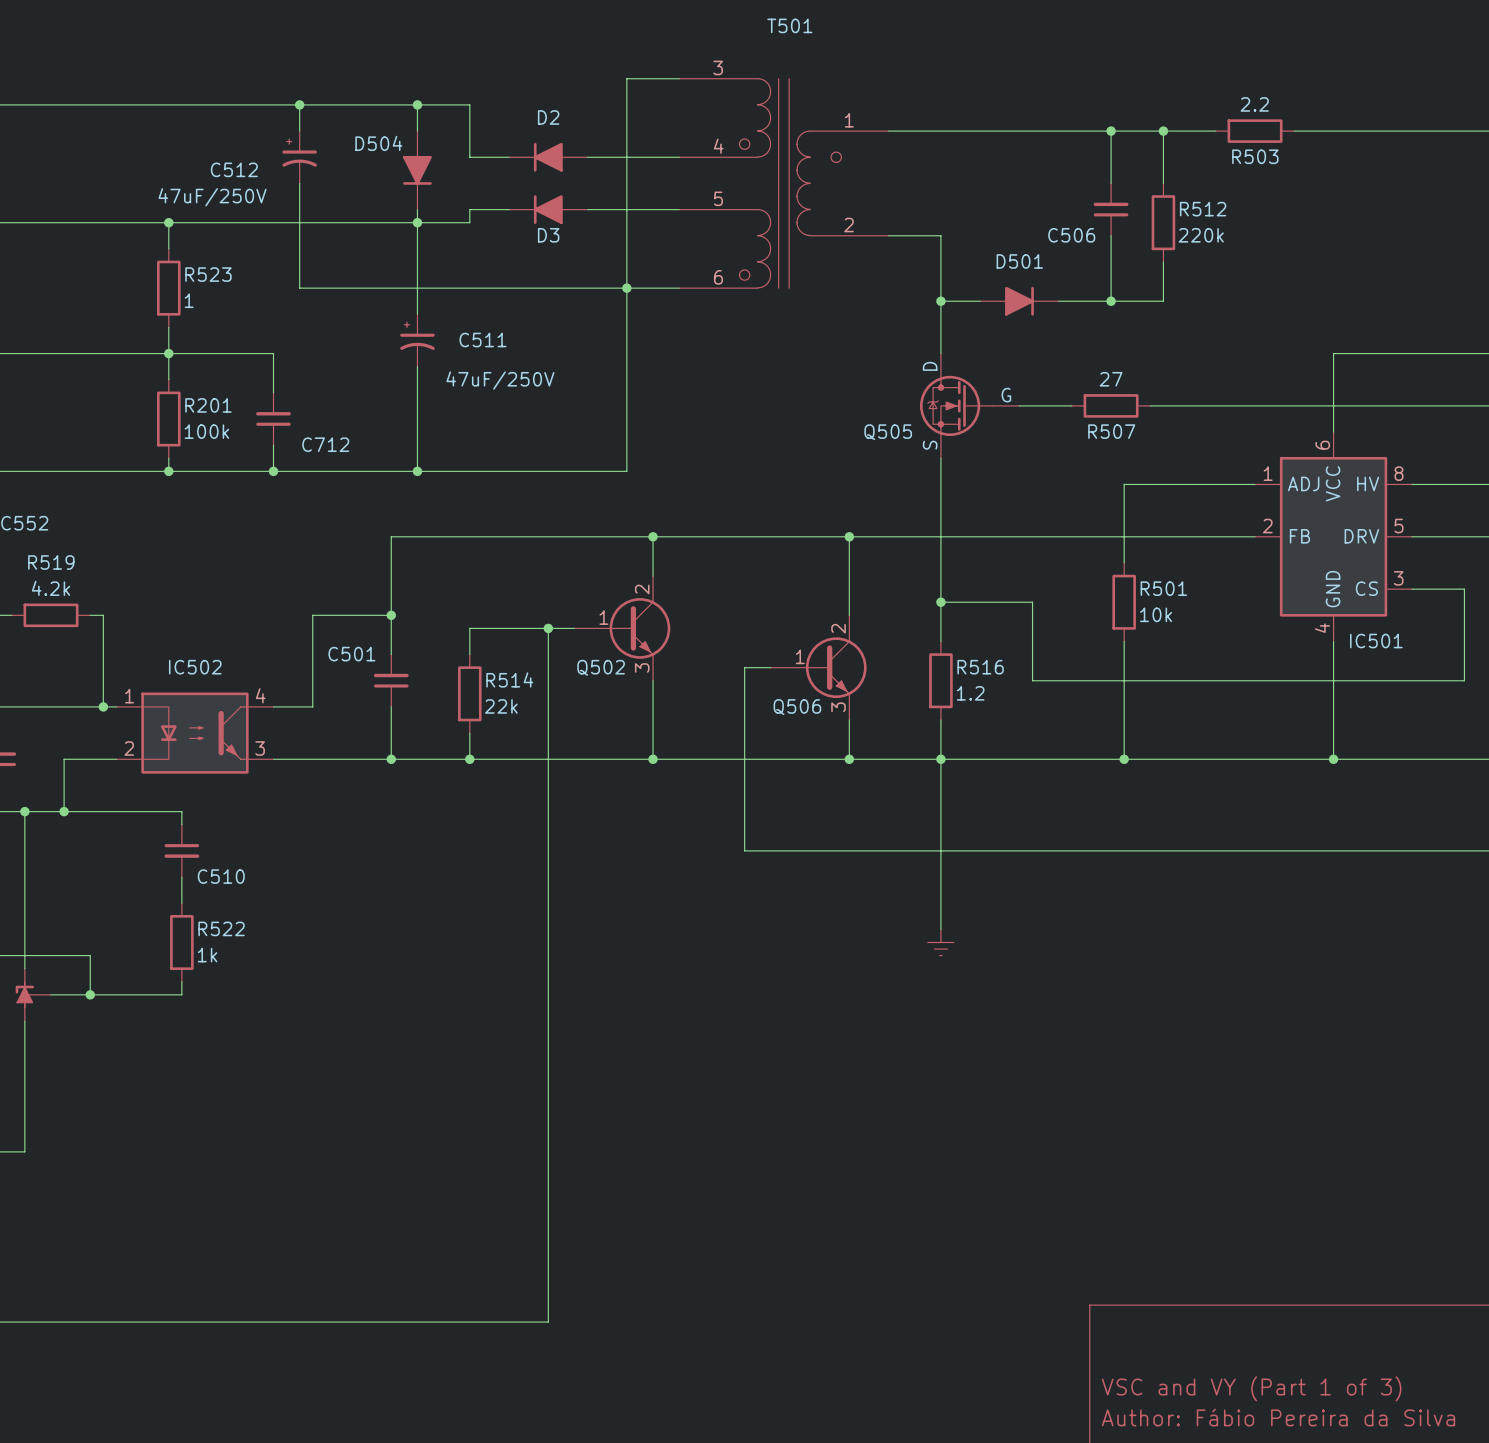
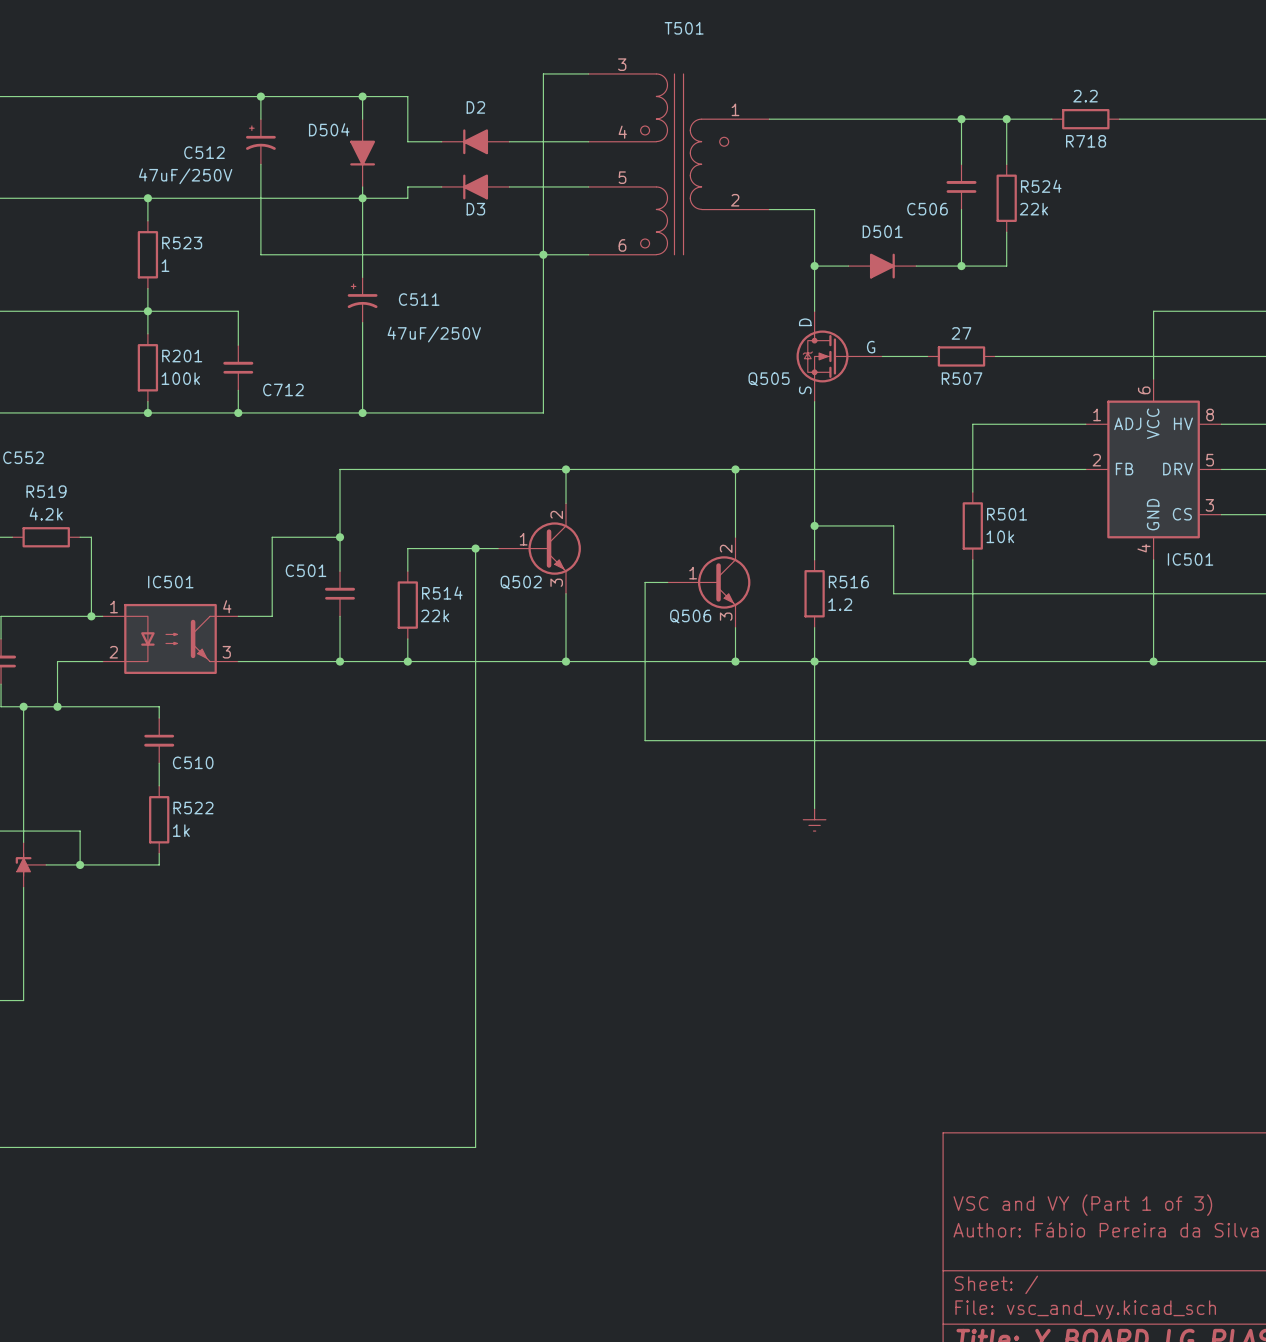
R503 name: R503 (1255, 156) -> R718 (1086, 141)
R512 name: R512 (1203, 209) -> R524 (1041, 186)
R512 value: 220k (1201, 235) -> 22k (1033, 209)
IC502 name: IC502 (195, 667) -> IC501 (170, 582)

